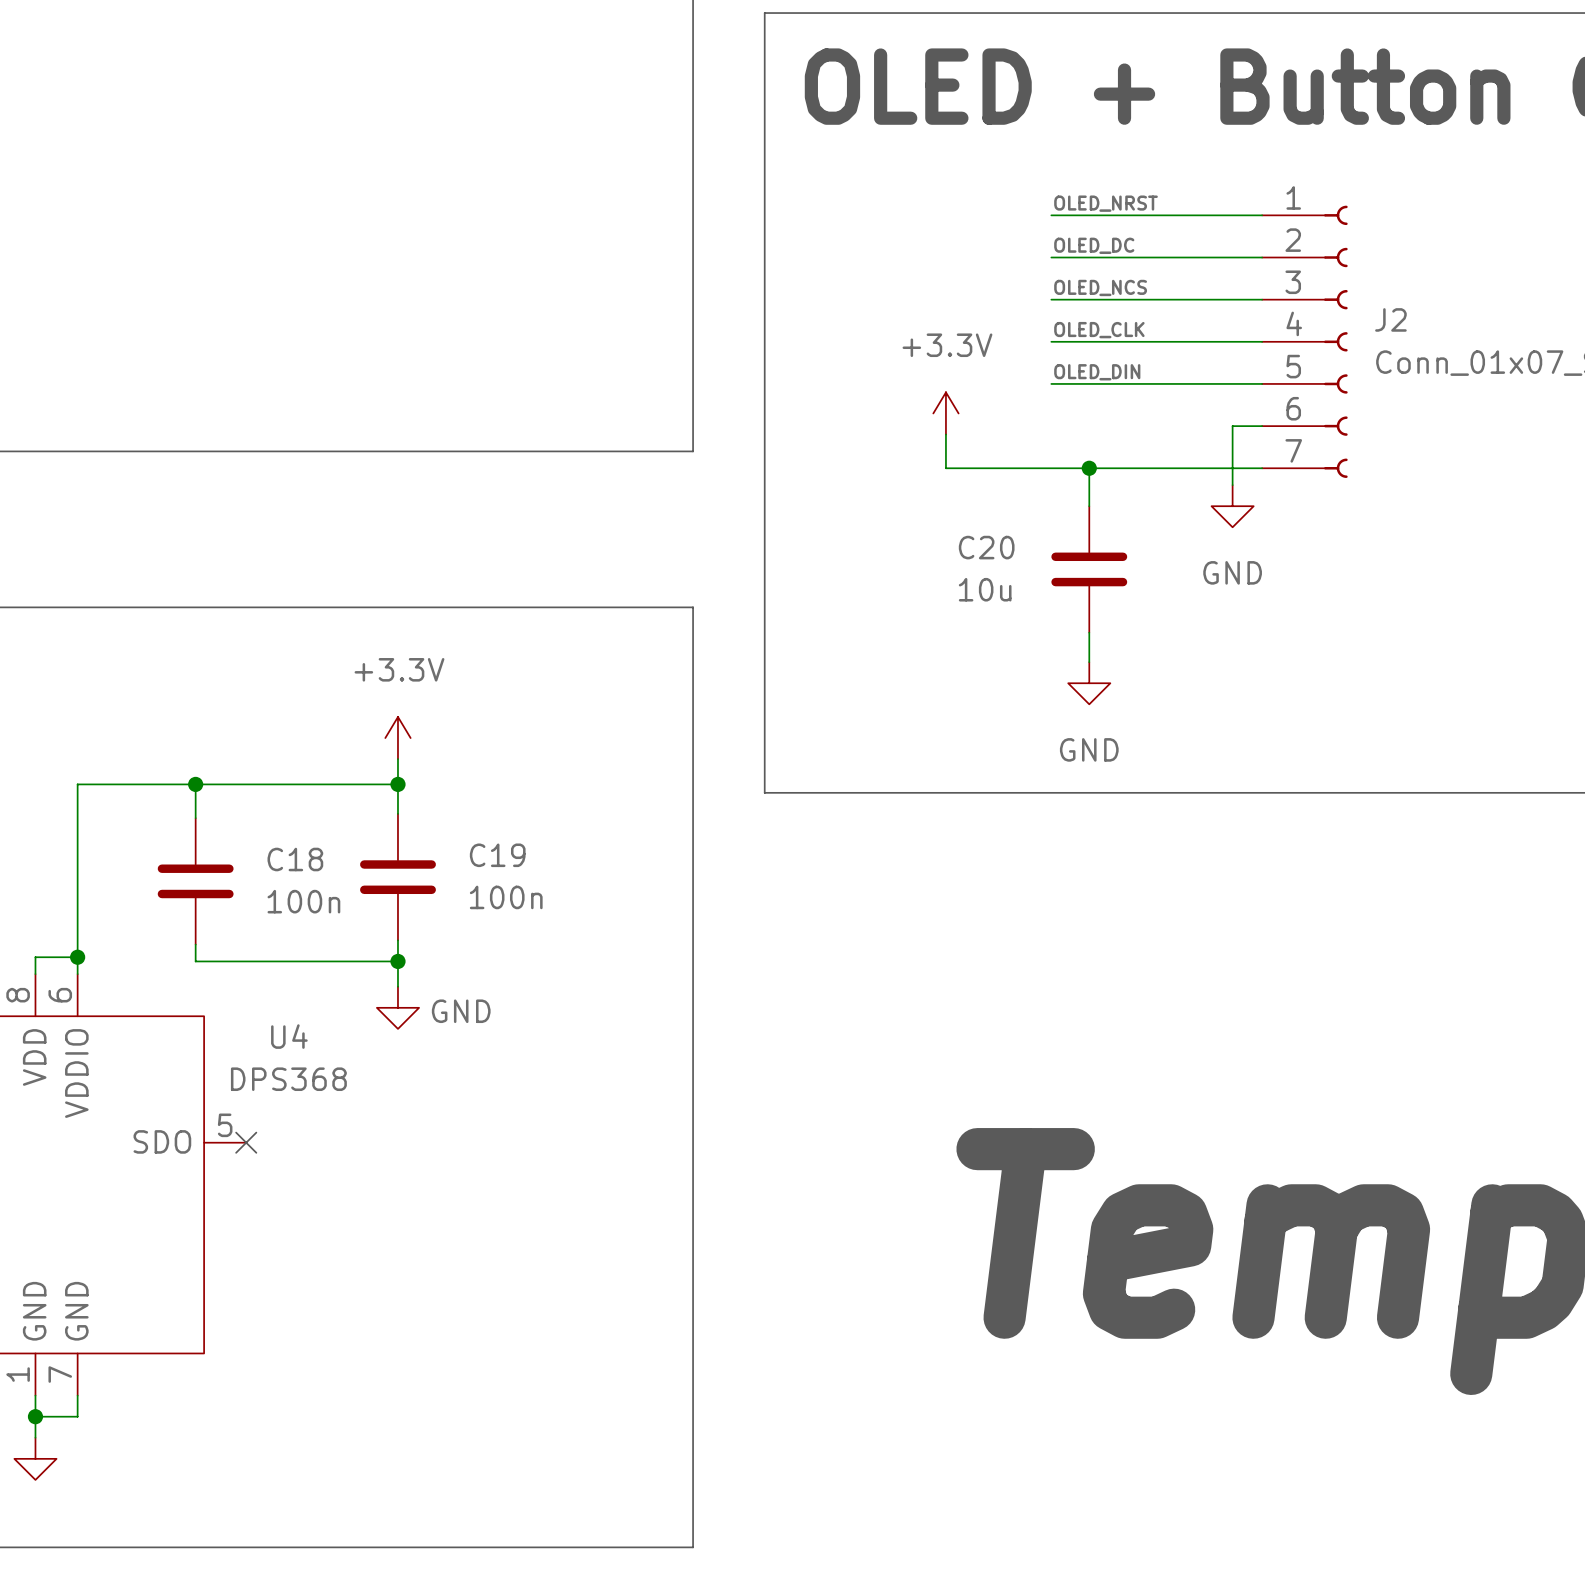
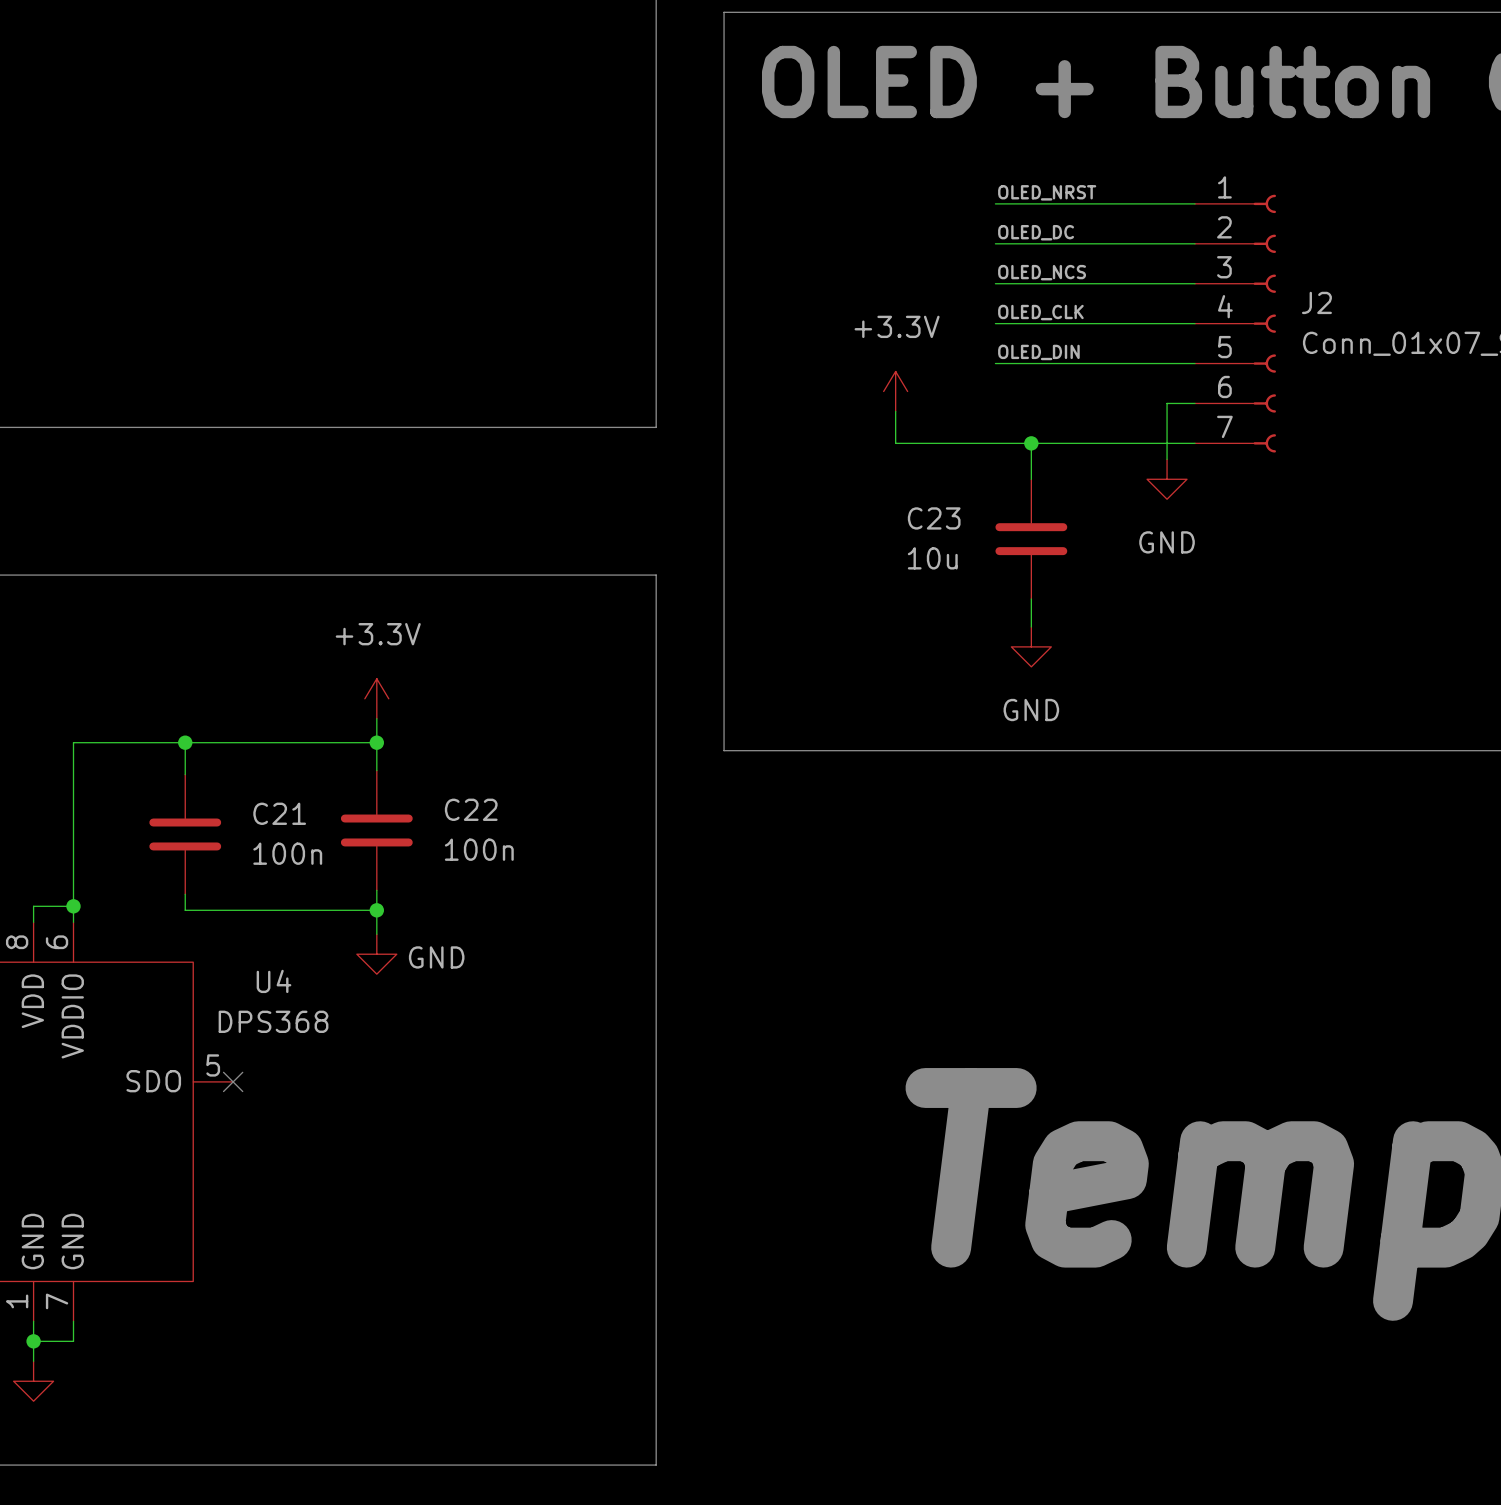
C20 name: C20 (986, 547) -> C23 (934, 518)
C19 name: C19 (497, 855) -> C22 (471, 809)
C18 name: C18 (295, 859) -> C21 (279, 813)

